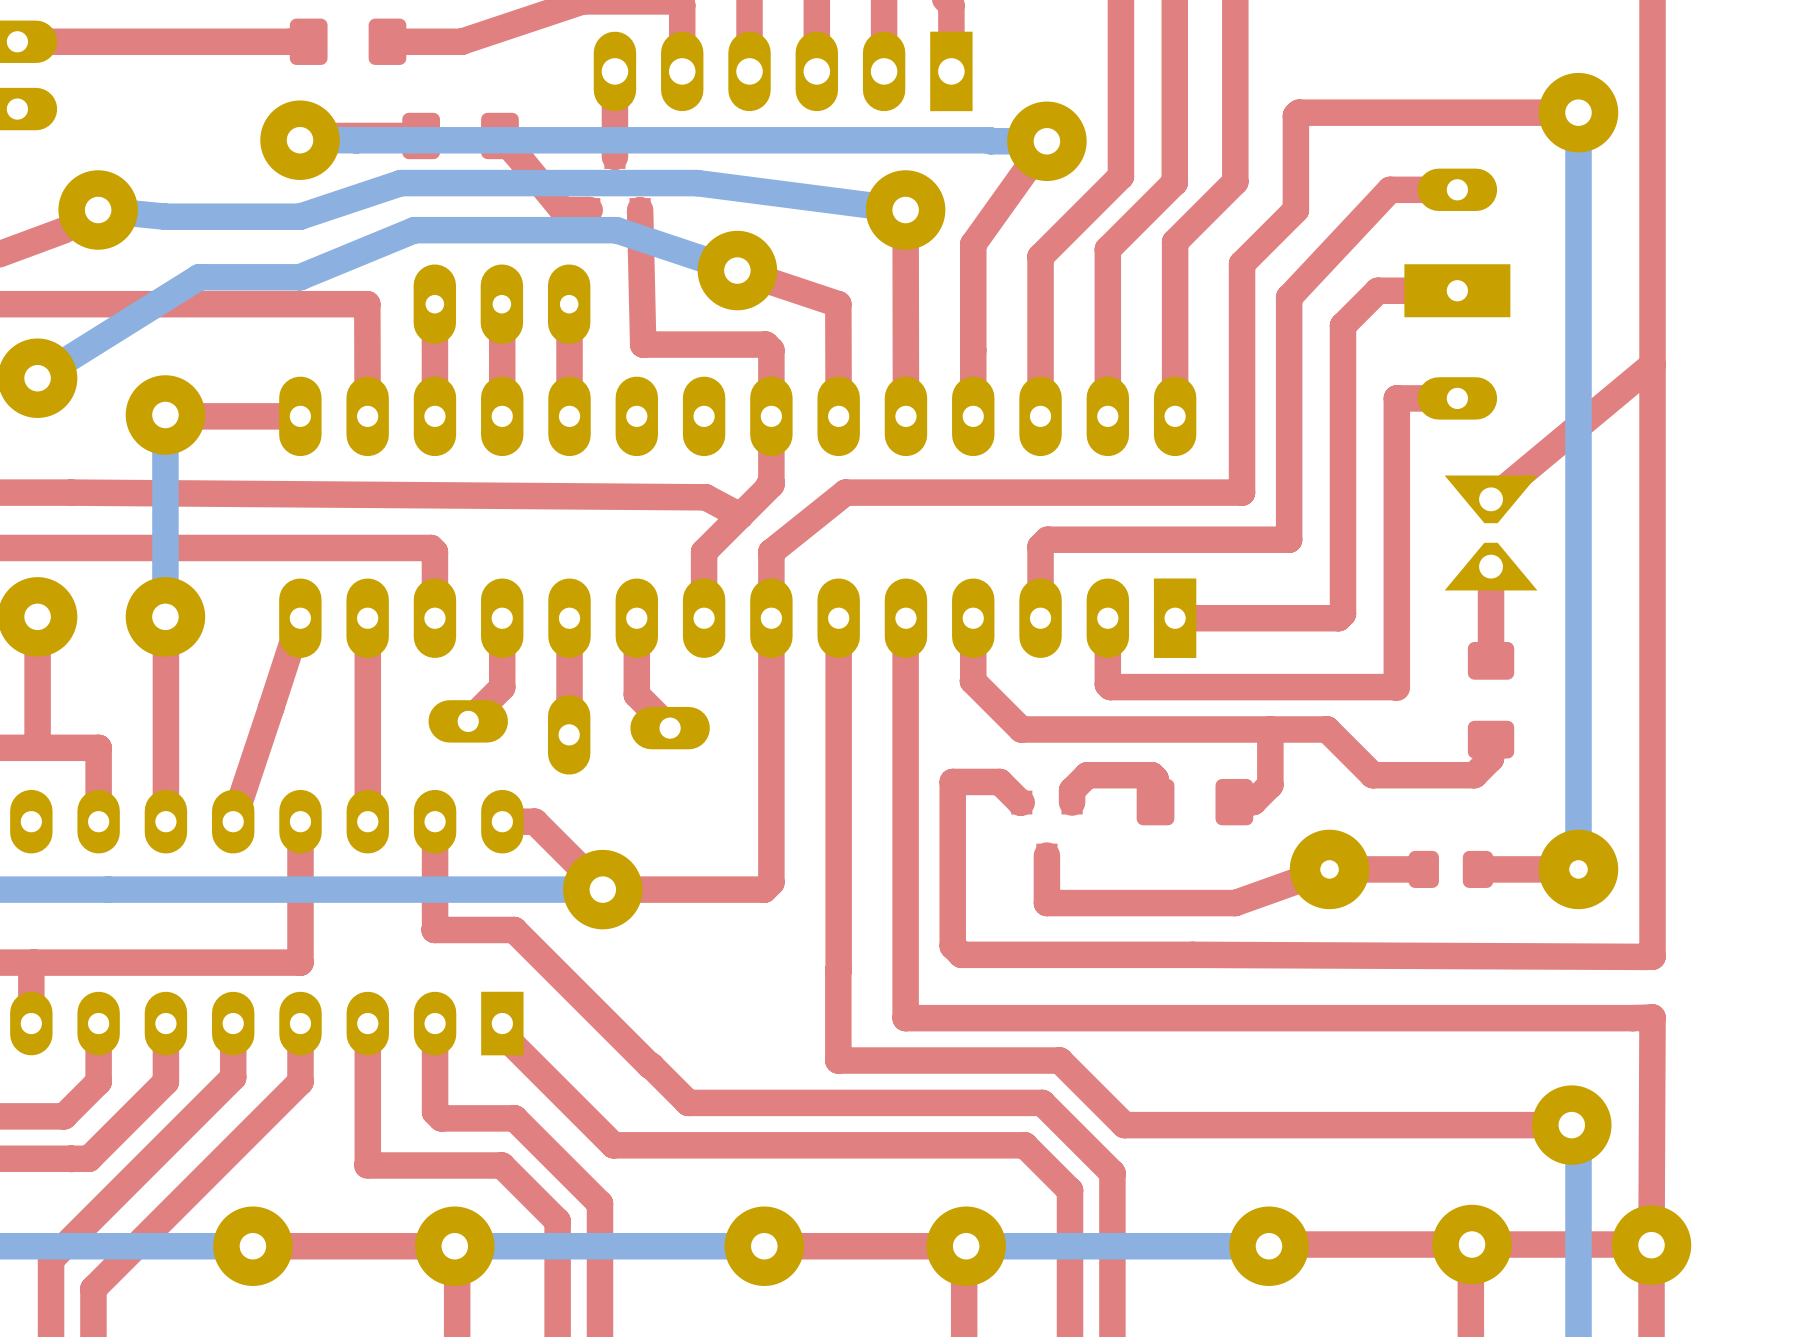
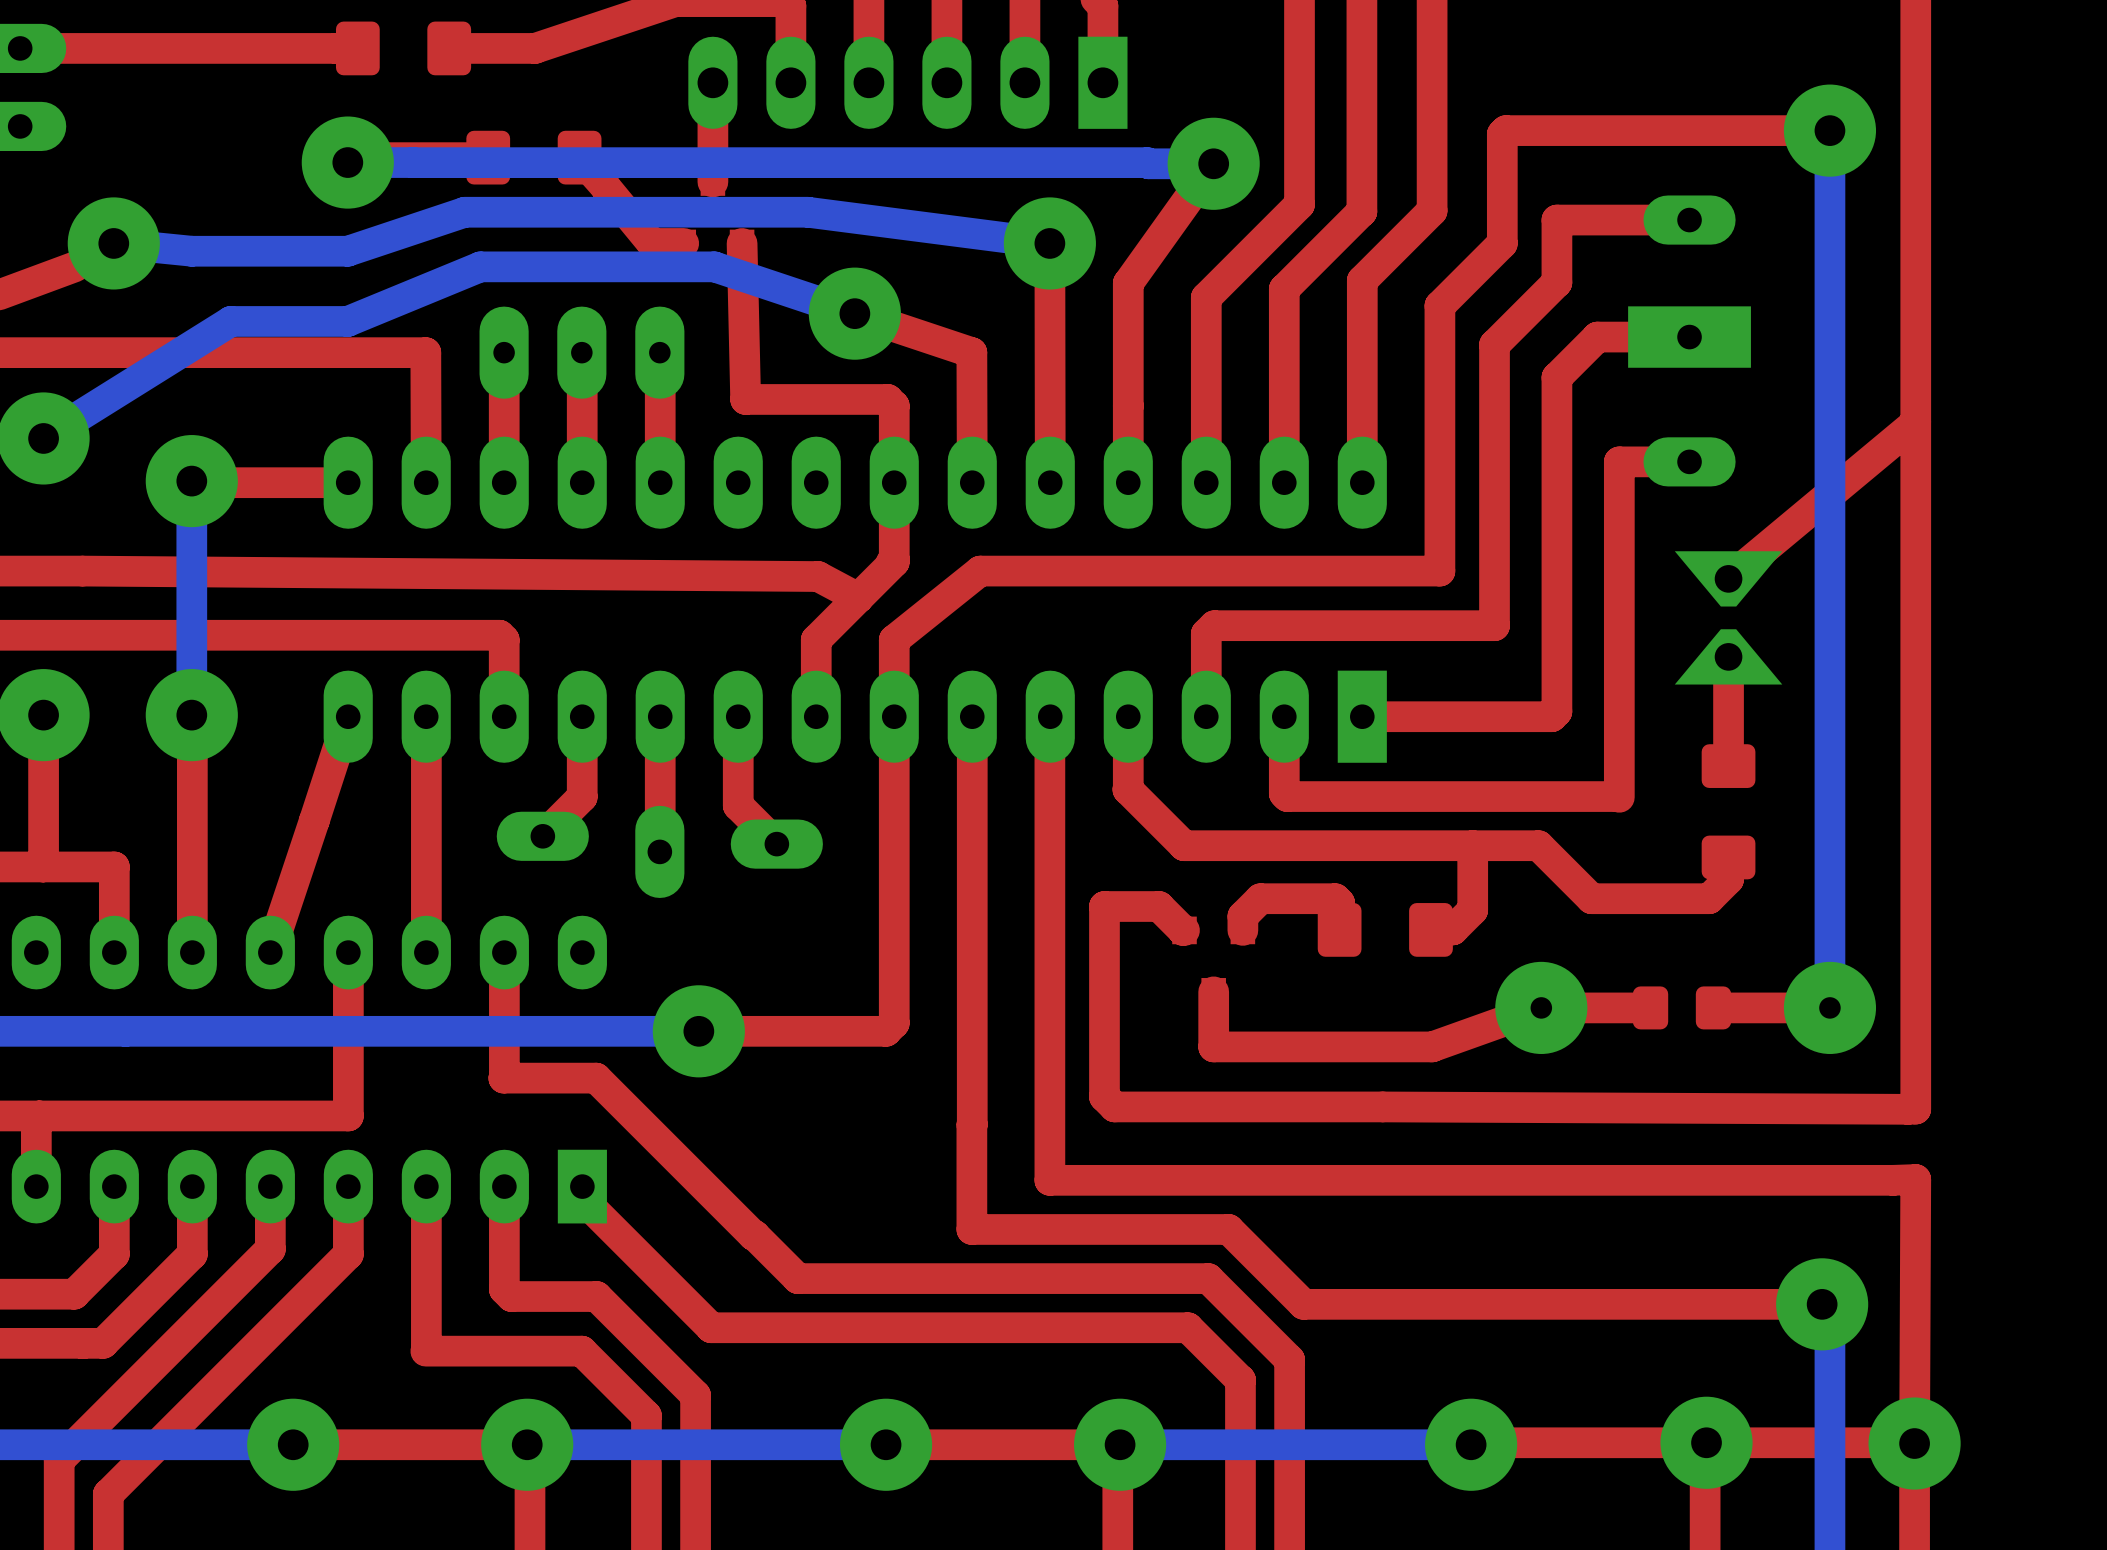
top track: (1390, 189) (1289, 297) -> (1611, 220) (1556, 220) (1556, 282) (1494, 344)
top track: (502, 821) (534, 821) (602, 889) -> none

